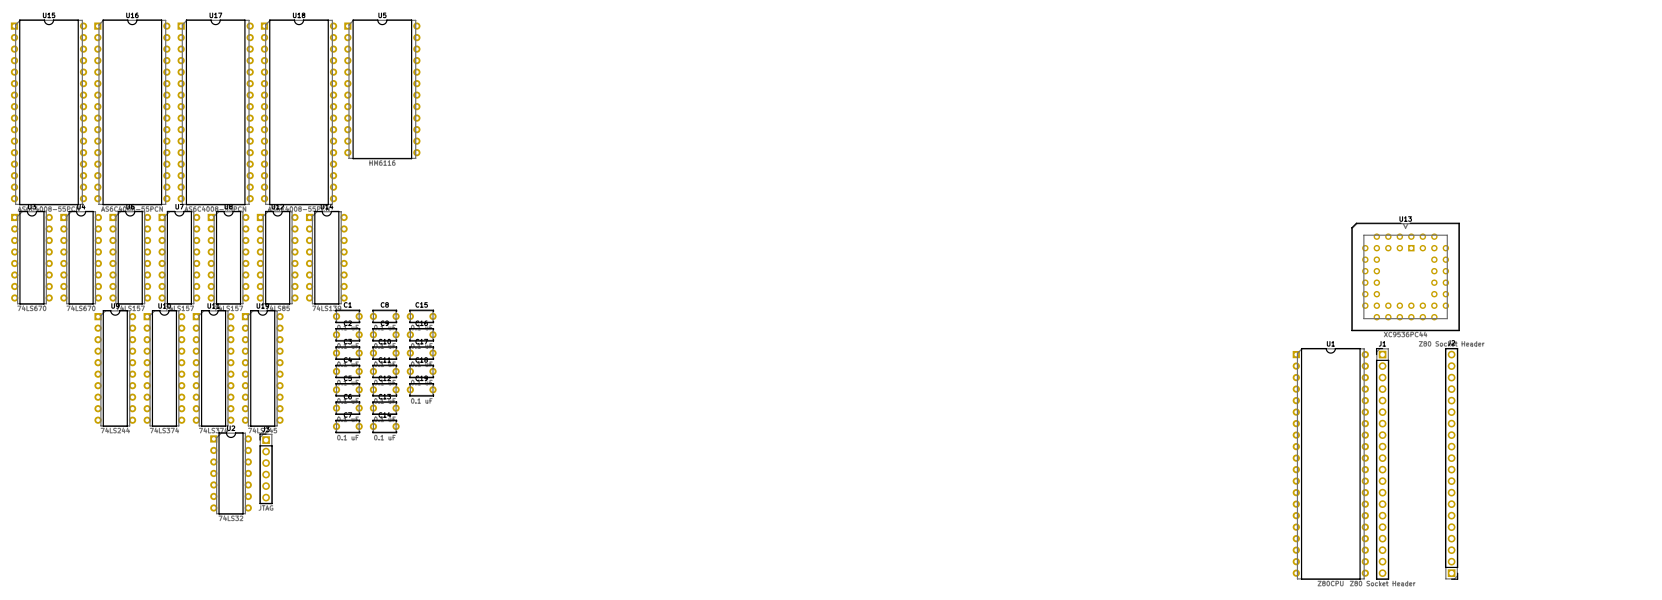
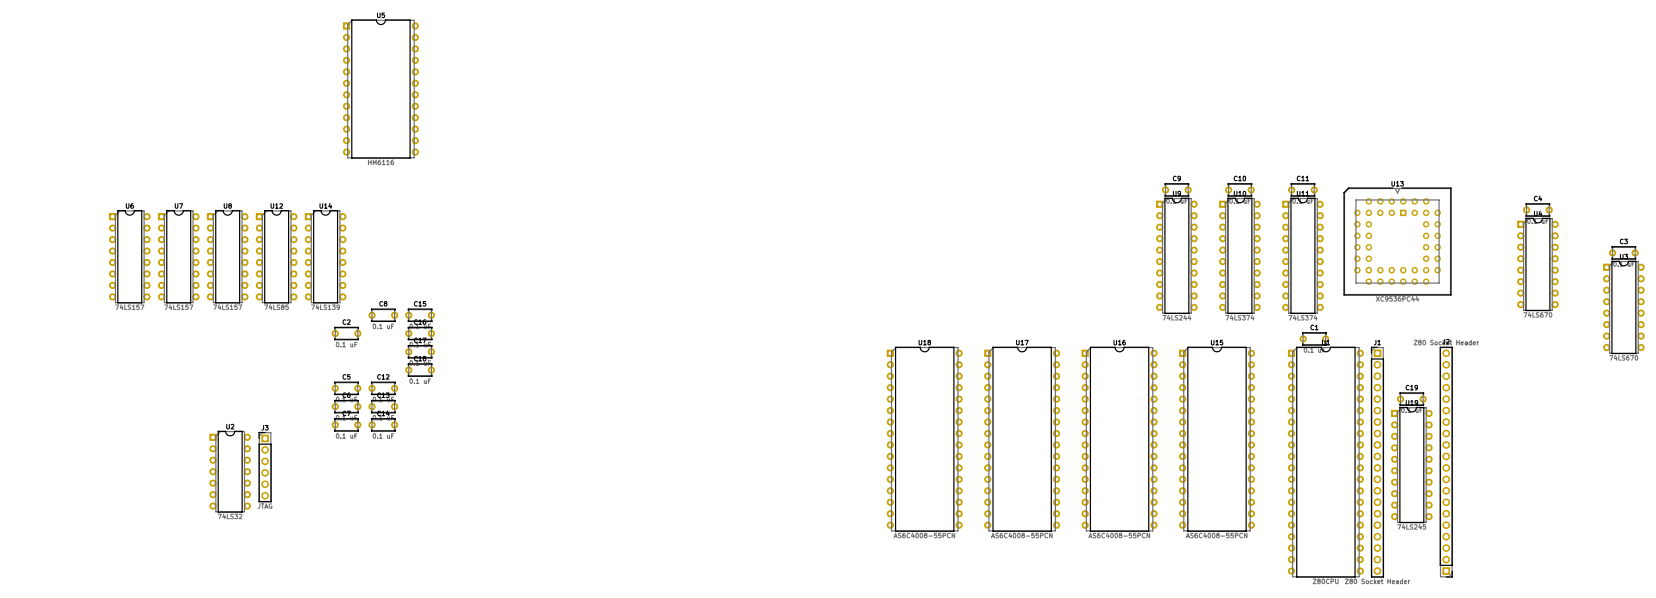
part position: (48, 112) -> (1216, 439)
part position: (132, 112) -> (1119, 439)
part position: (215, 112) -> (1022, 439)
part position: (299, 112) -> (924, 439)
part position: (31, 257) -> (1623, 307)
part position: (81, 257) -> (1537, 264)
part position: (1405, 276) -> (1397, 241)
part position: (347, 316) -> (1314, 338)
part position: (384, 334) -> (1176, 189)
part position: (347, 353) -> (1623, 252)
part position: (384, 353) -> (1239, 189)
part position: (115, 368) -> (1176, 255)
part position: (164, 368) -> (1239, 255)
part position: (213, 368) -> (1302, 255)
part position: (262, 368) -> (1411, 465)
part position: (347, 371) -> (1537, 210)
part position: (384, 371) -> (1302, 189)
part position: (421, 389) -> (1411, 399)

